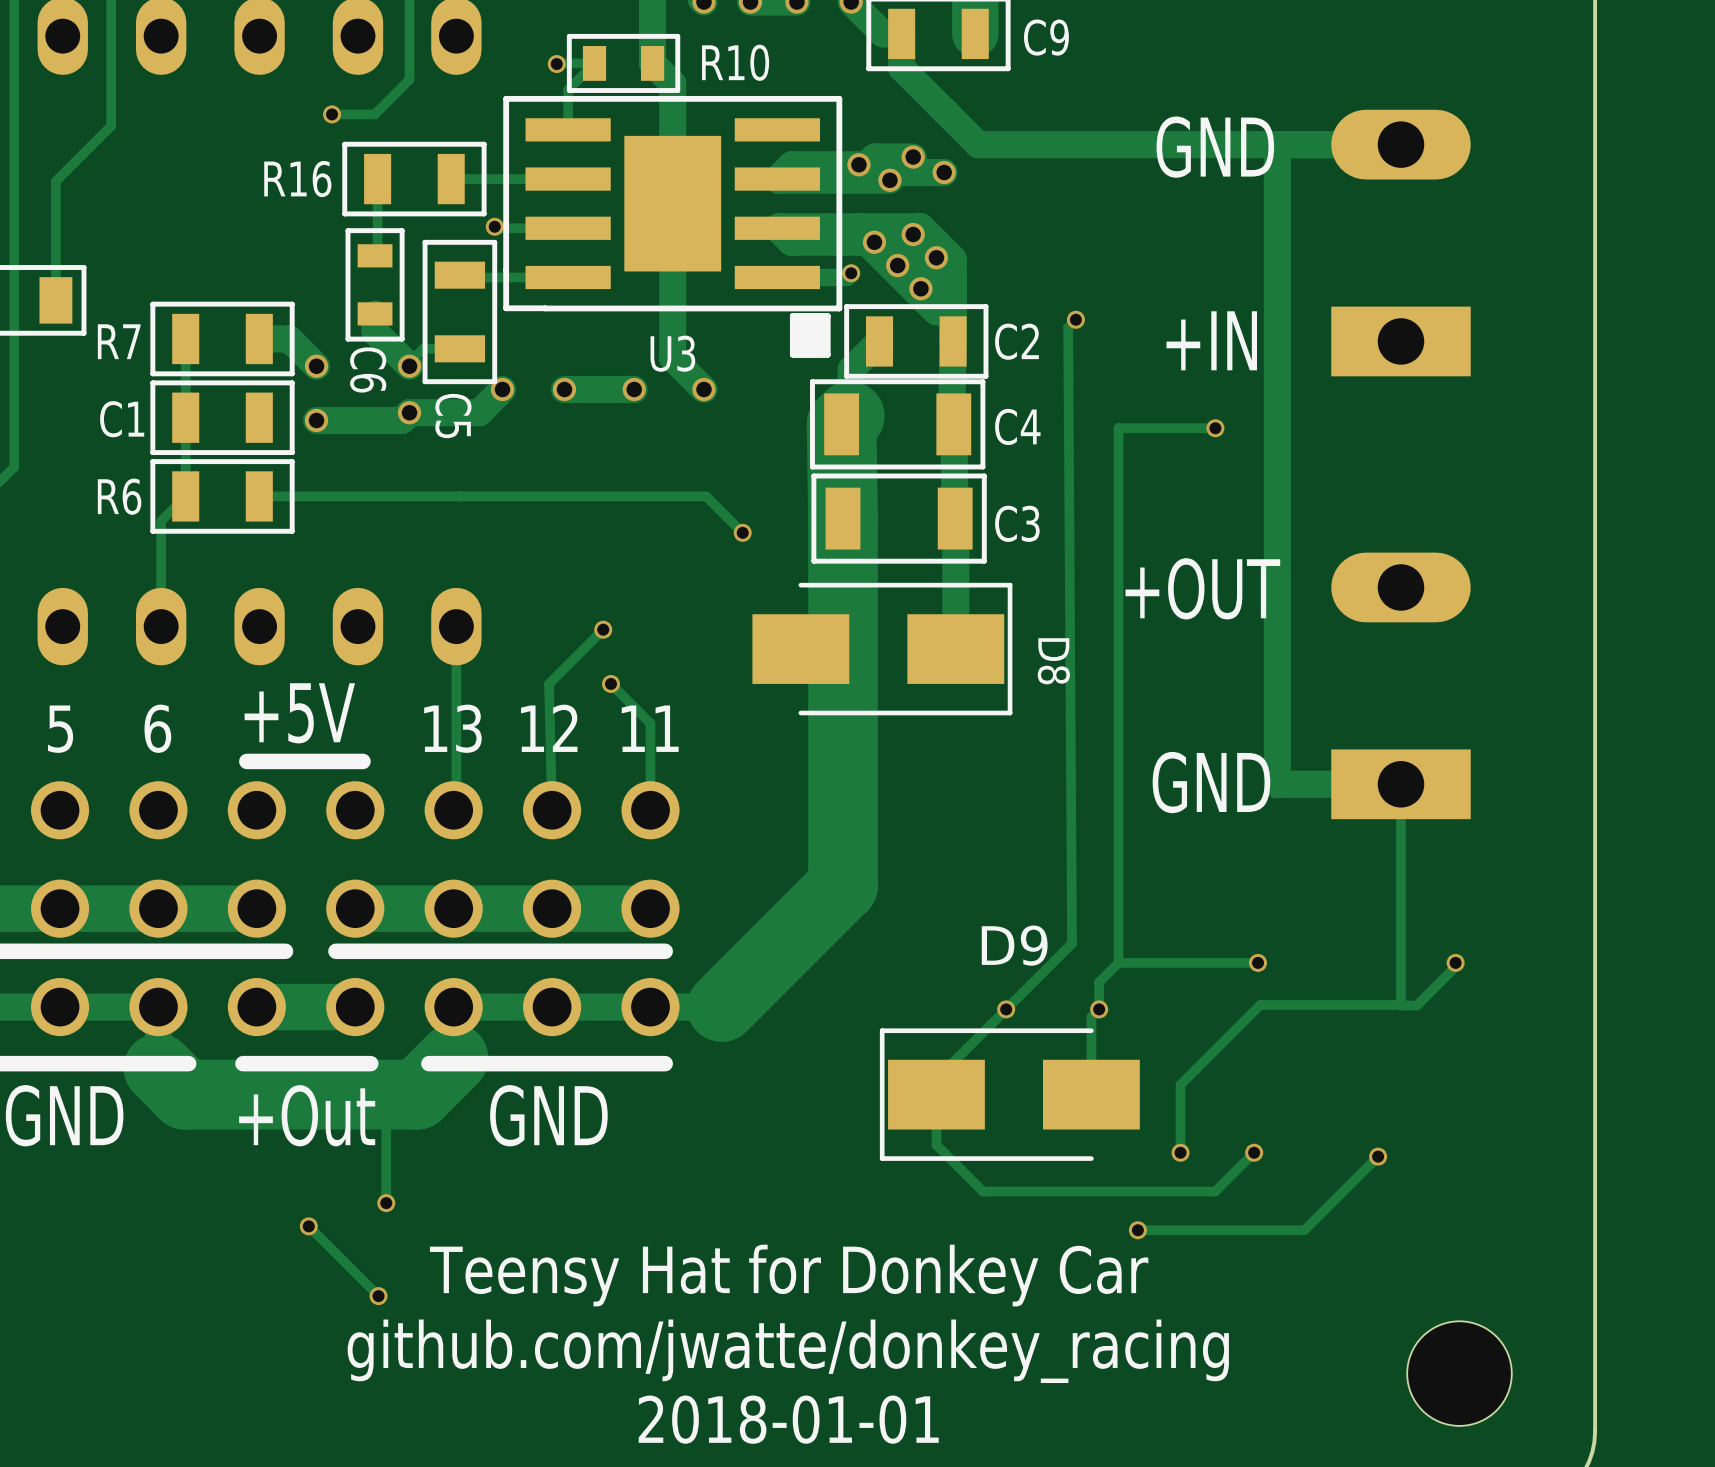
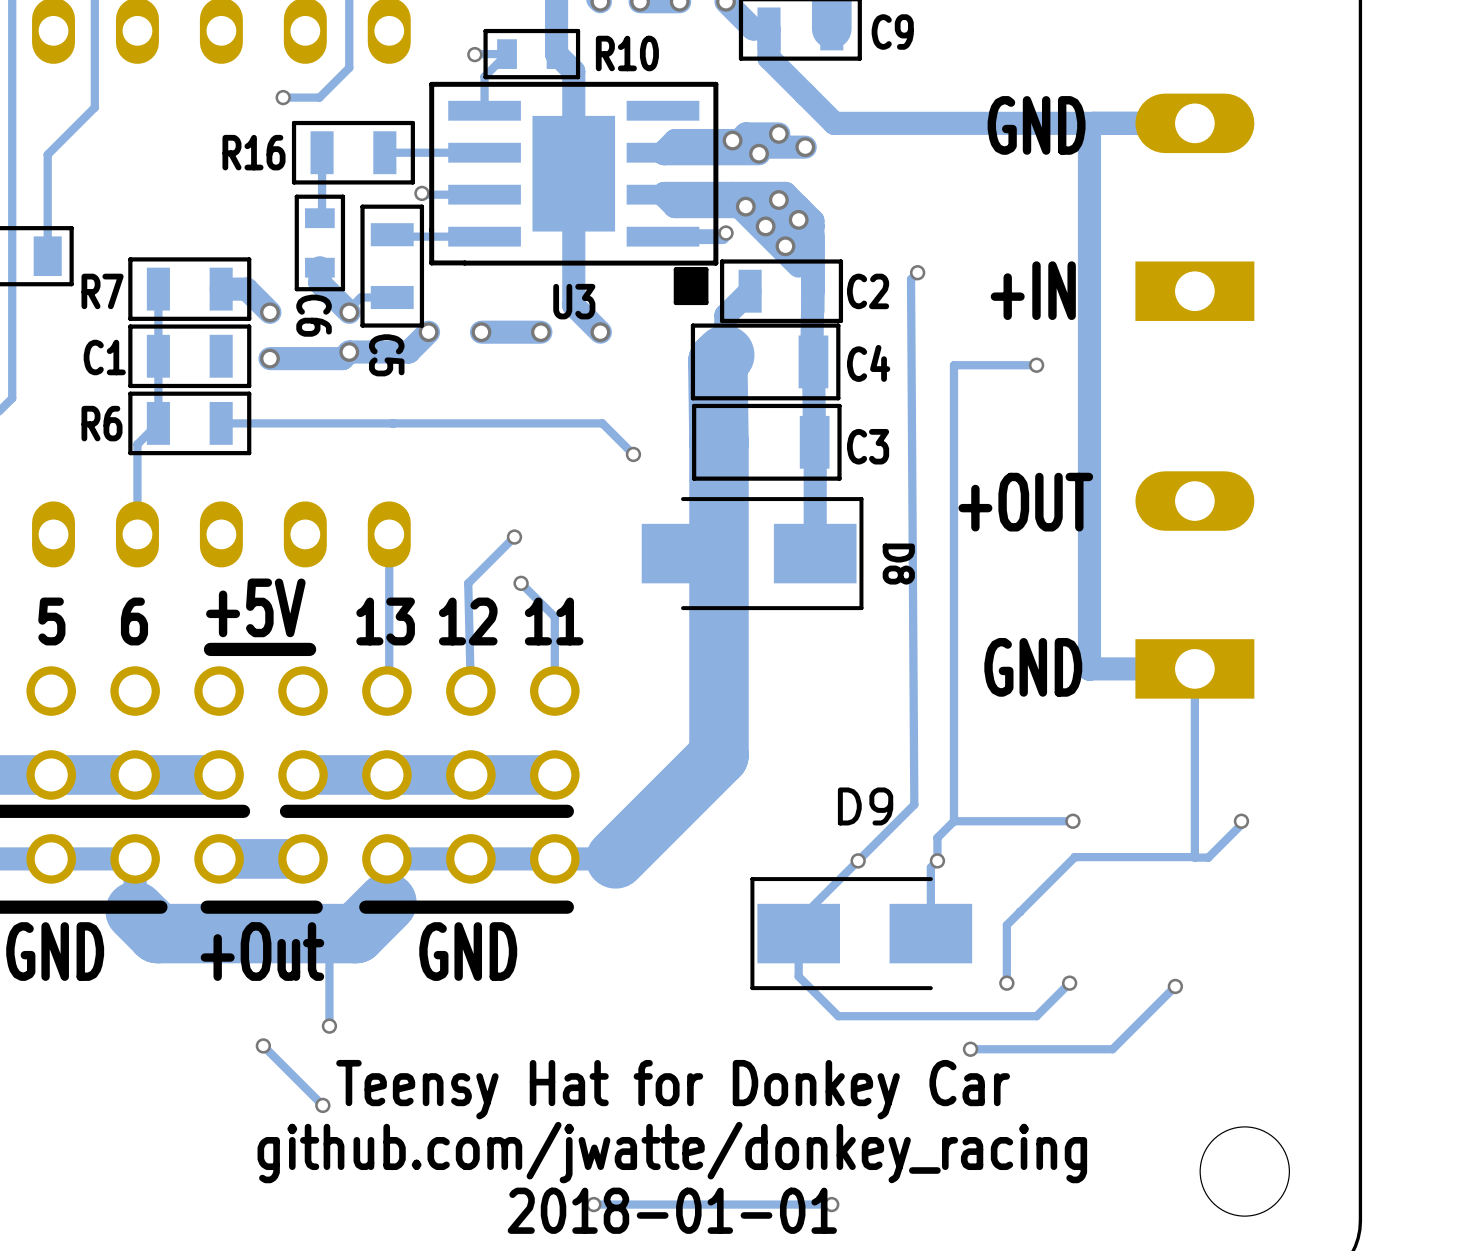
via: none -> (593, 1204)
track: none -> (831, 1204) (593, 1204)
via: none -> (831, 1204)

